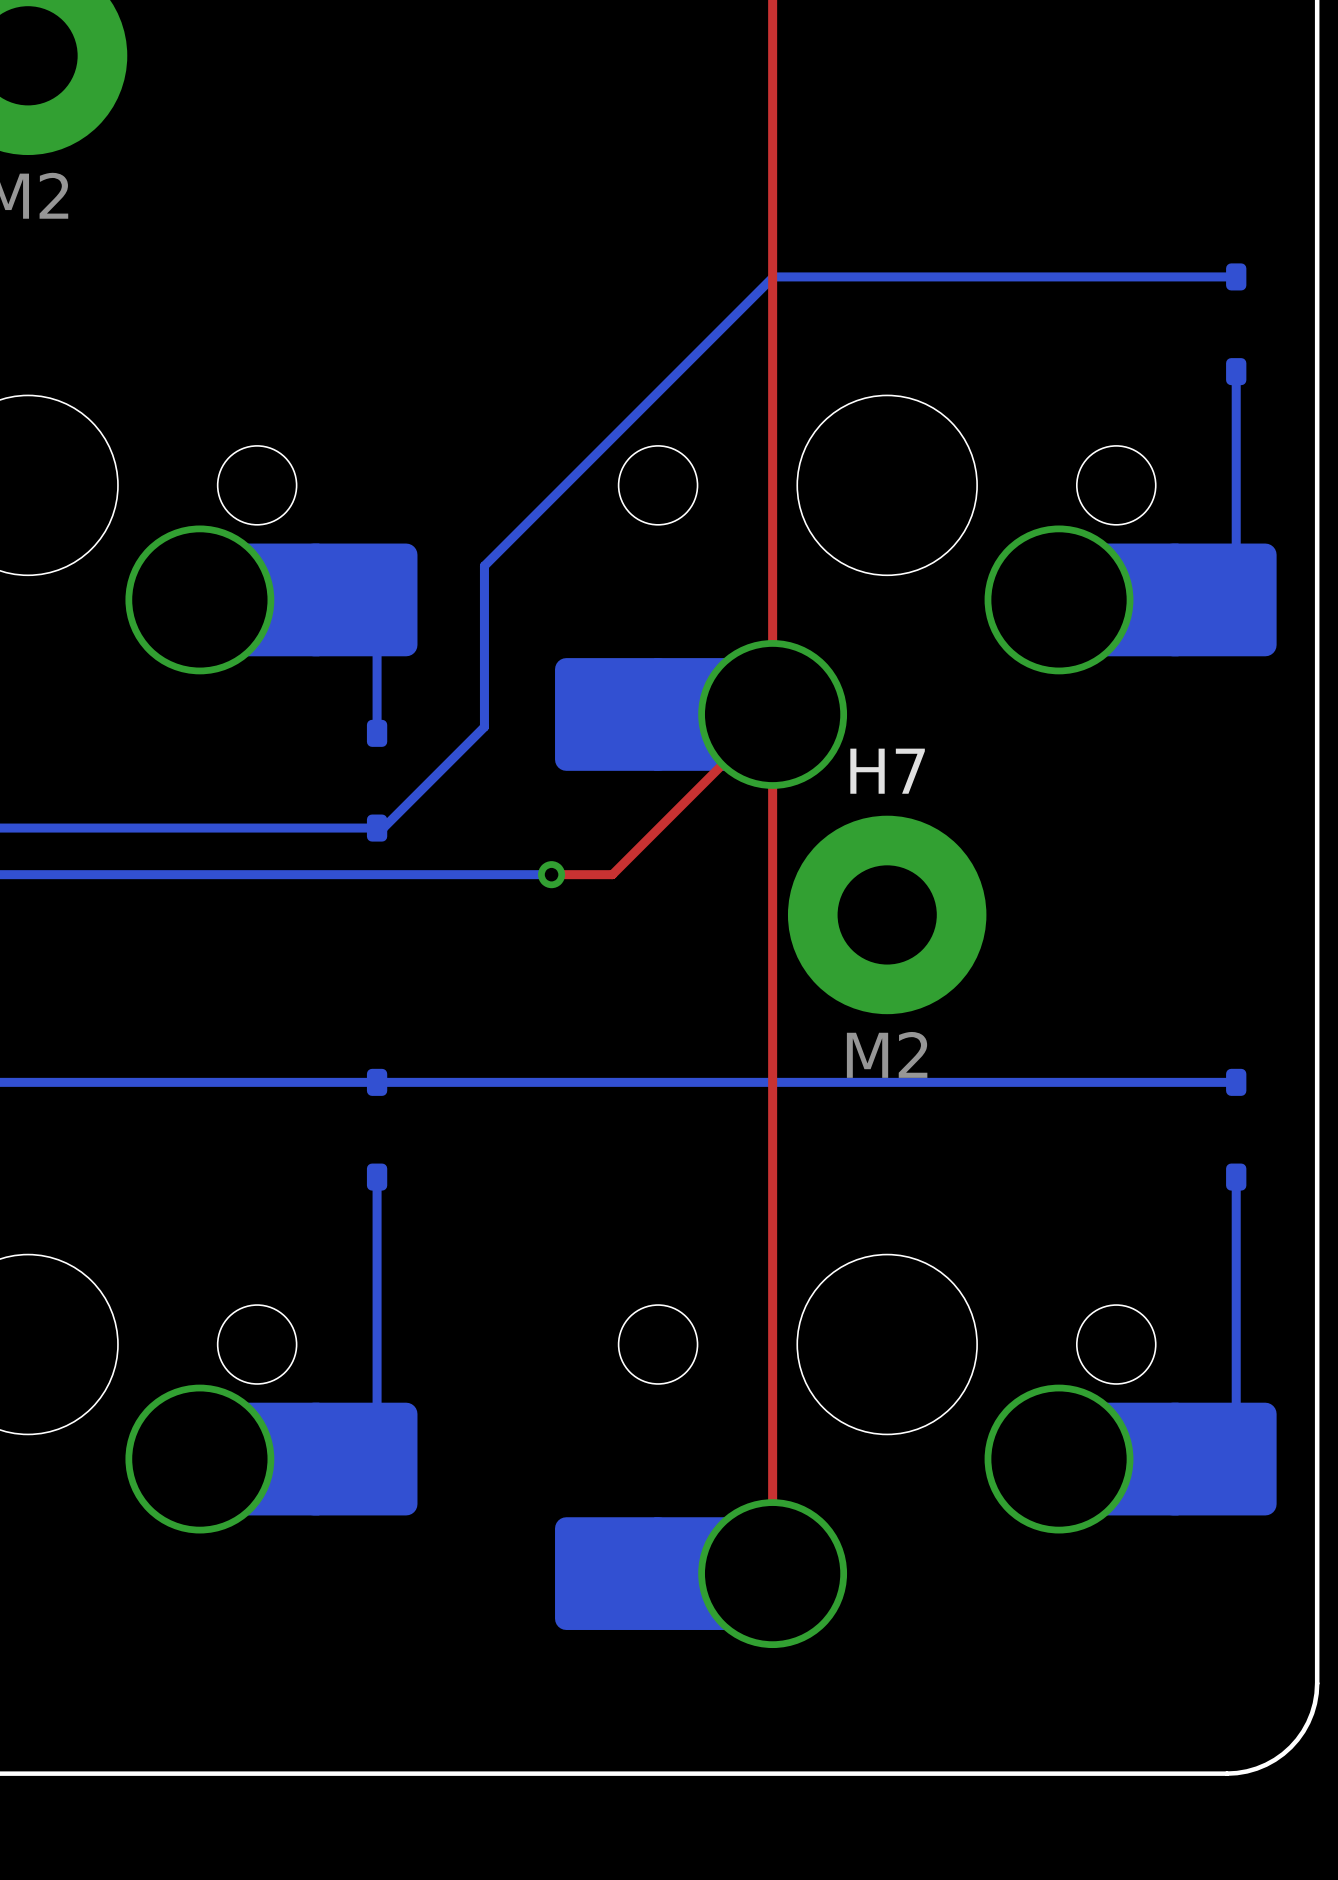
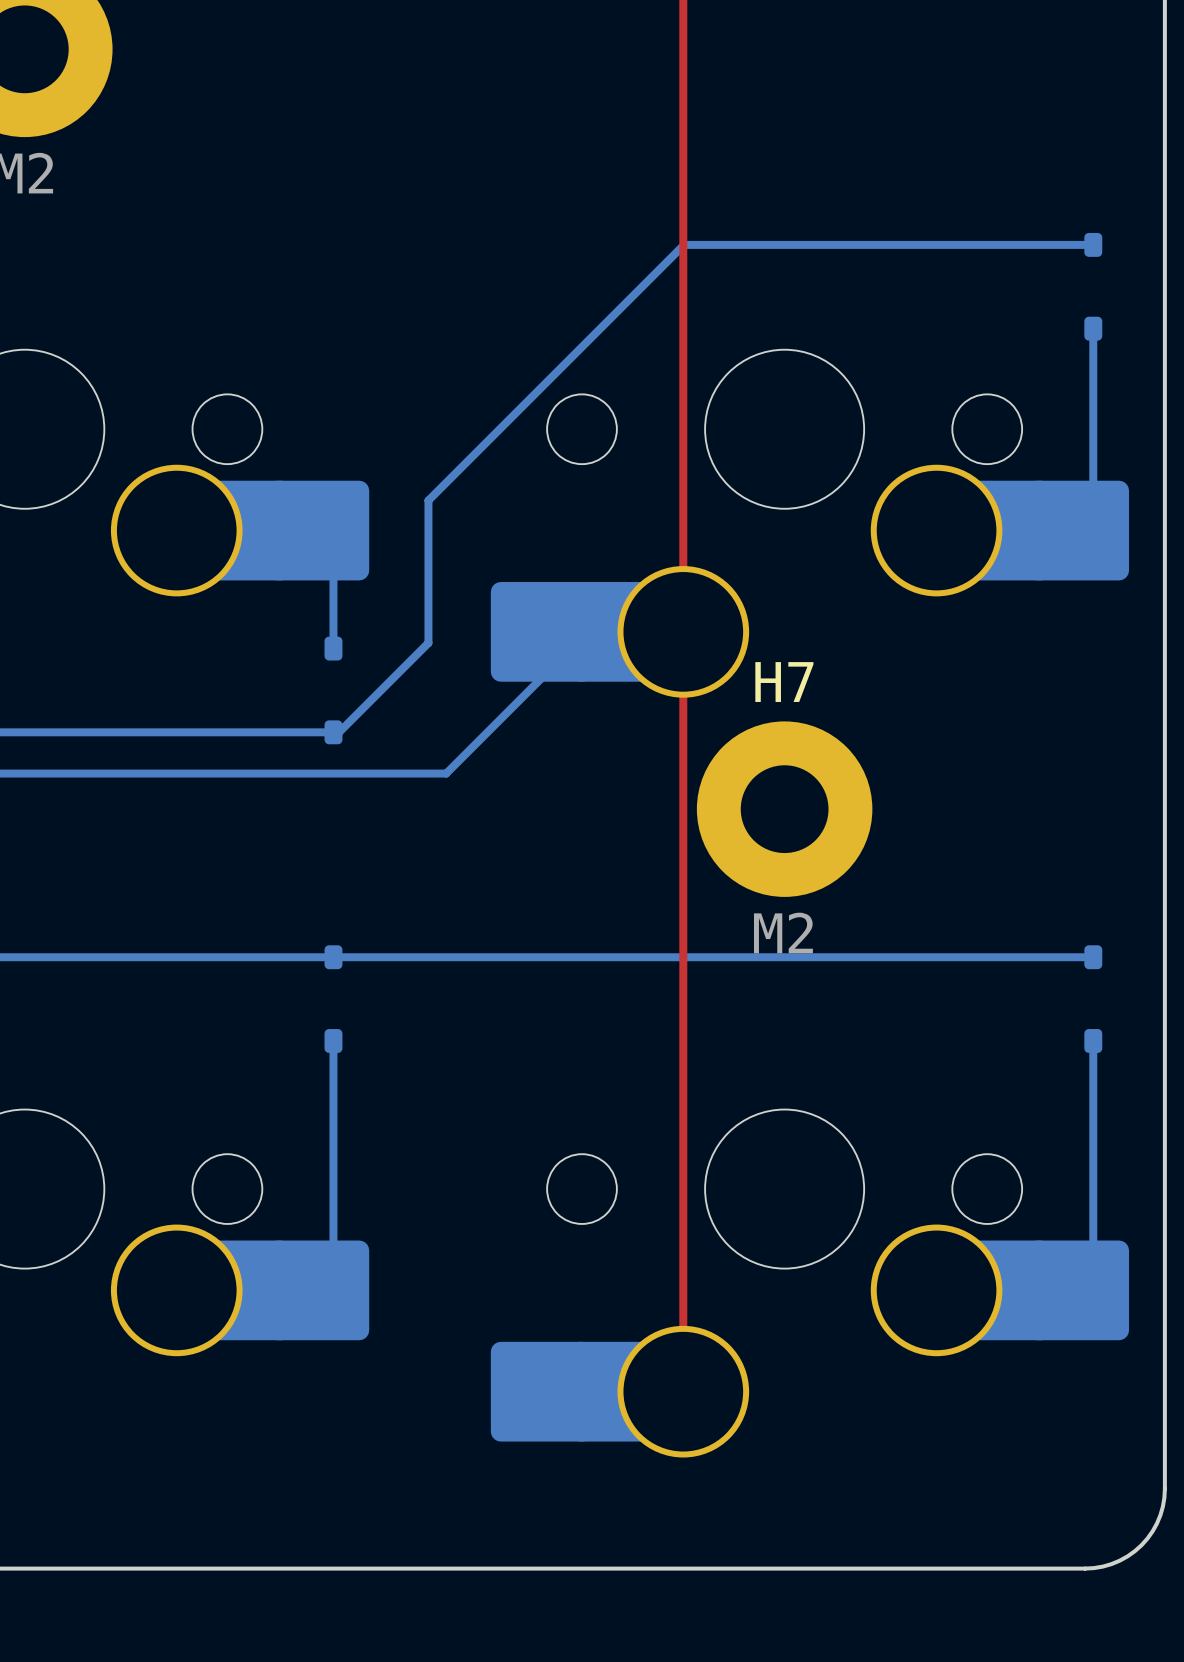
top track: (772, 714) (612, 874) (551, 874) -> none
bottom track: (504, 874) (551, 874) -> (446, 773) (541, 678) (541, 631)
via: (551, 874) -> none

